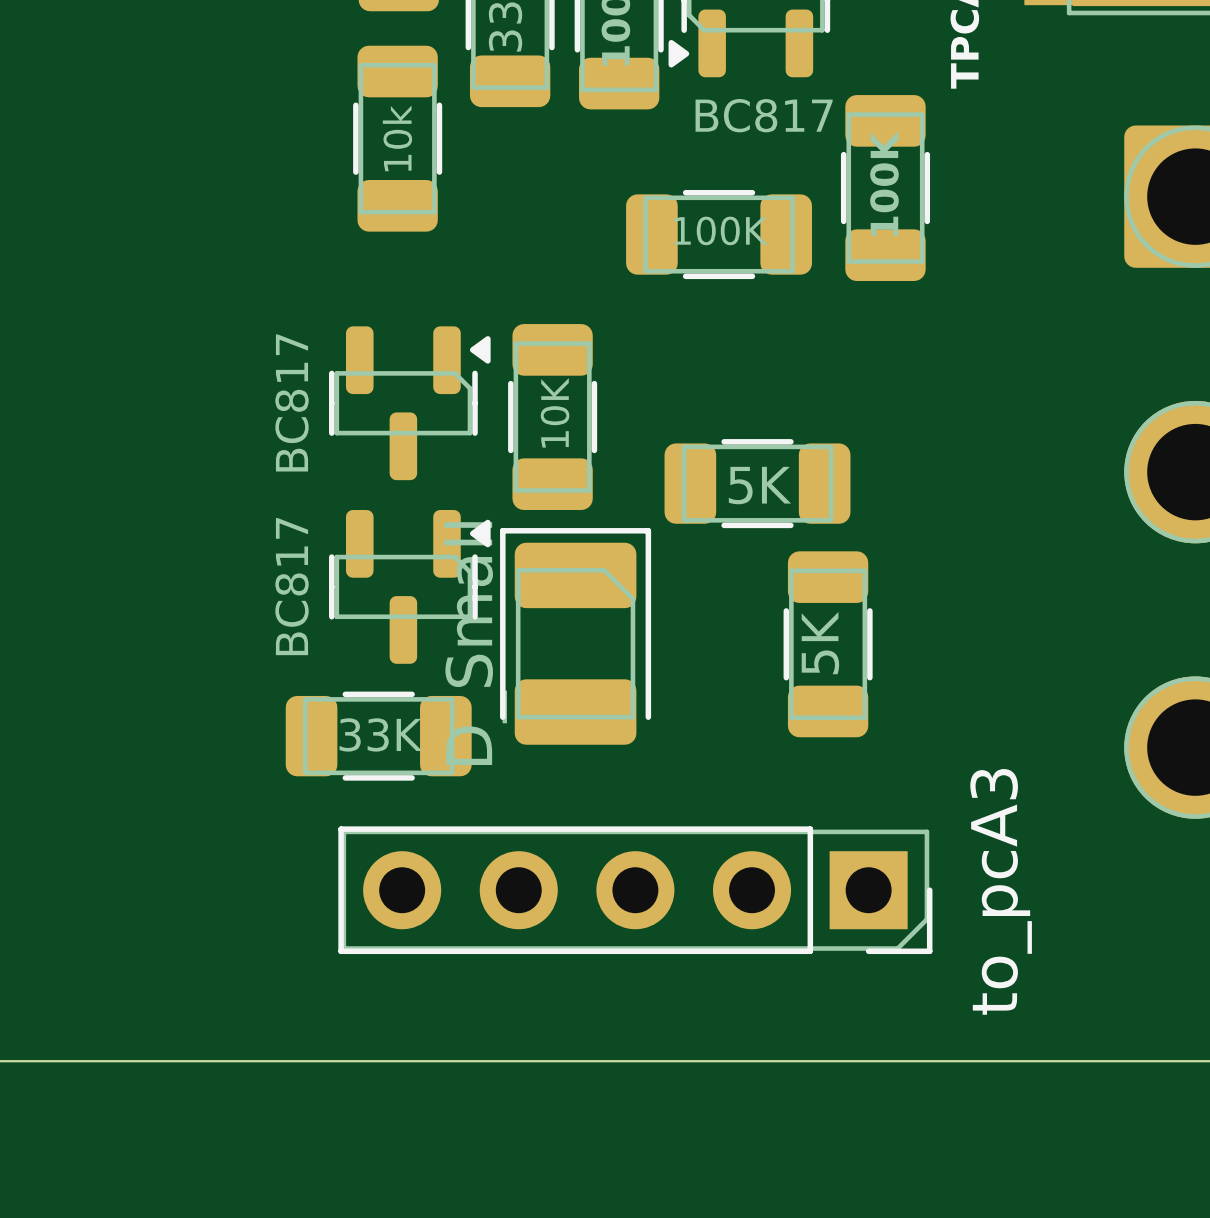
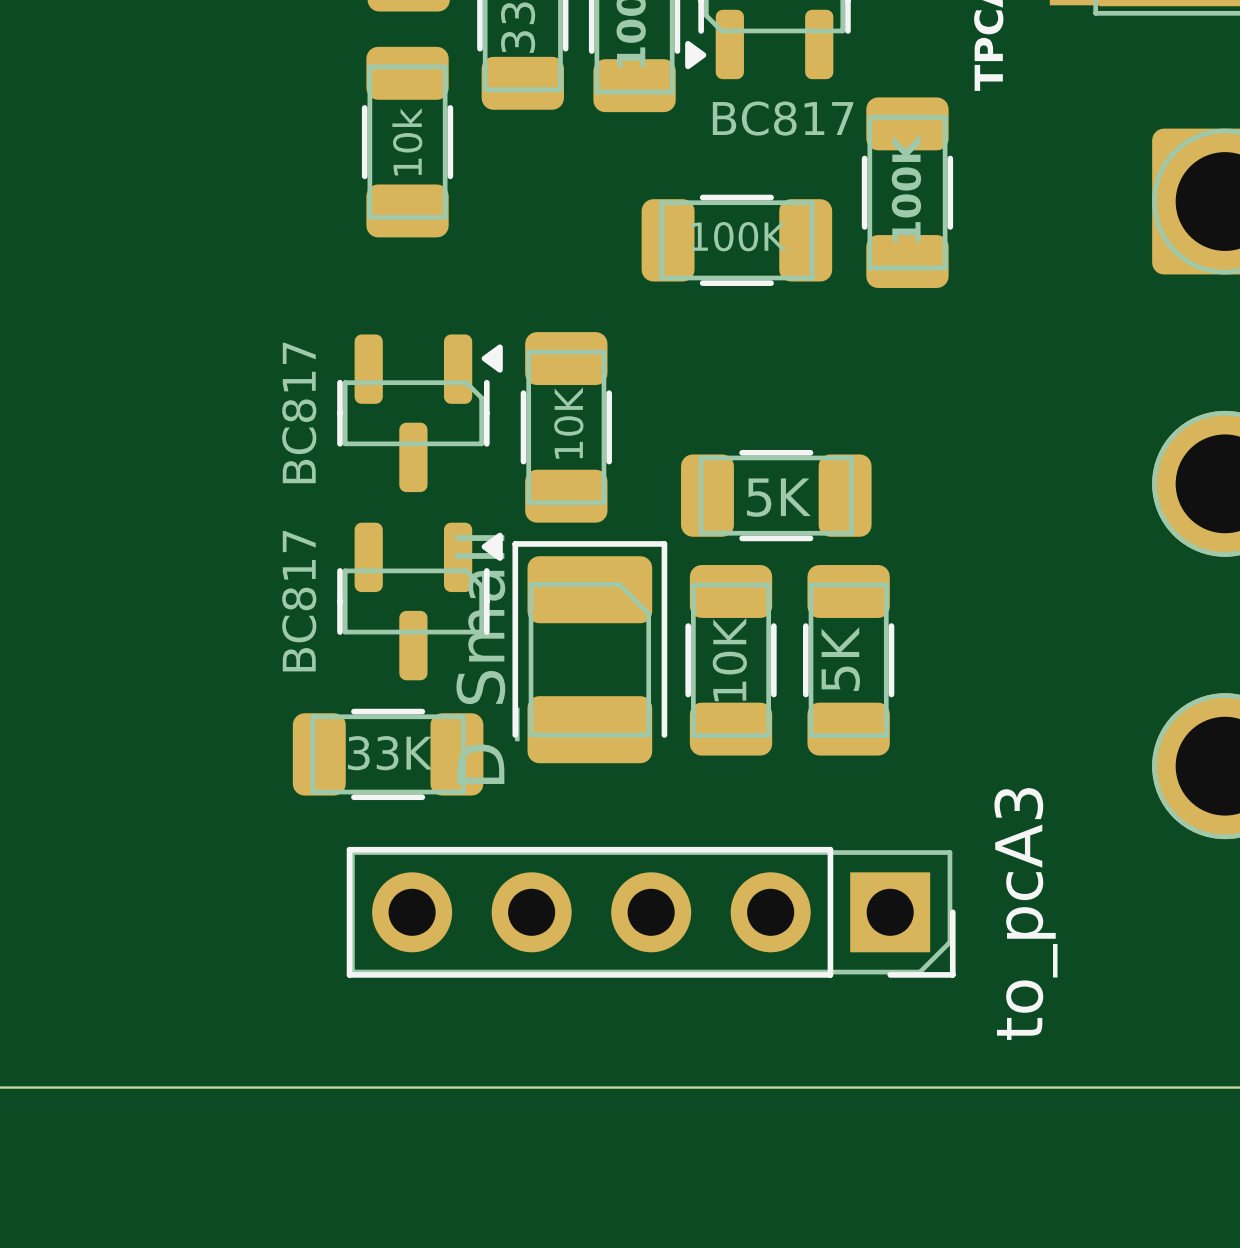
part: none -> 10K (731, 660)

